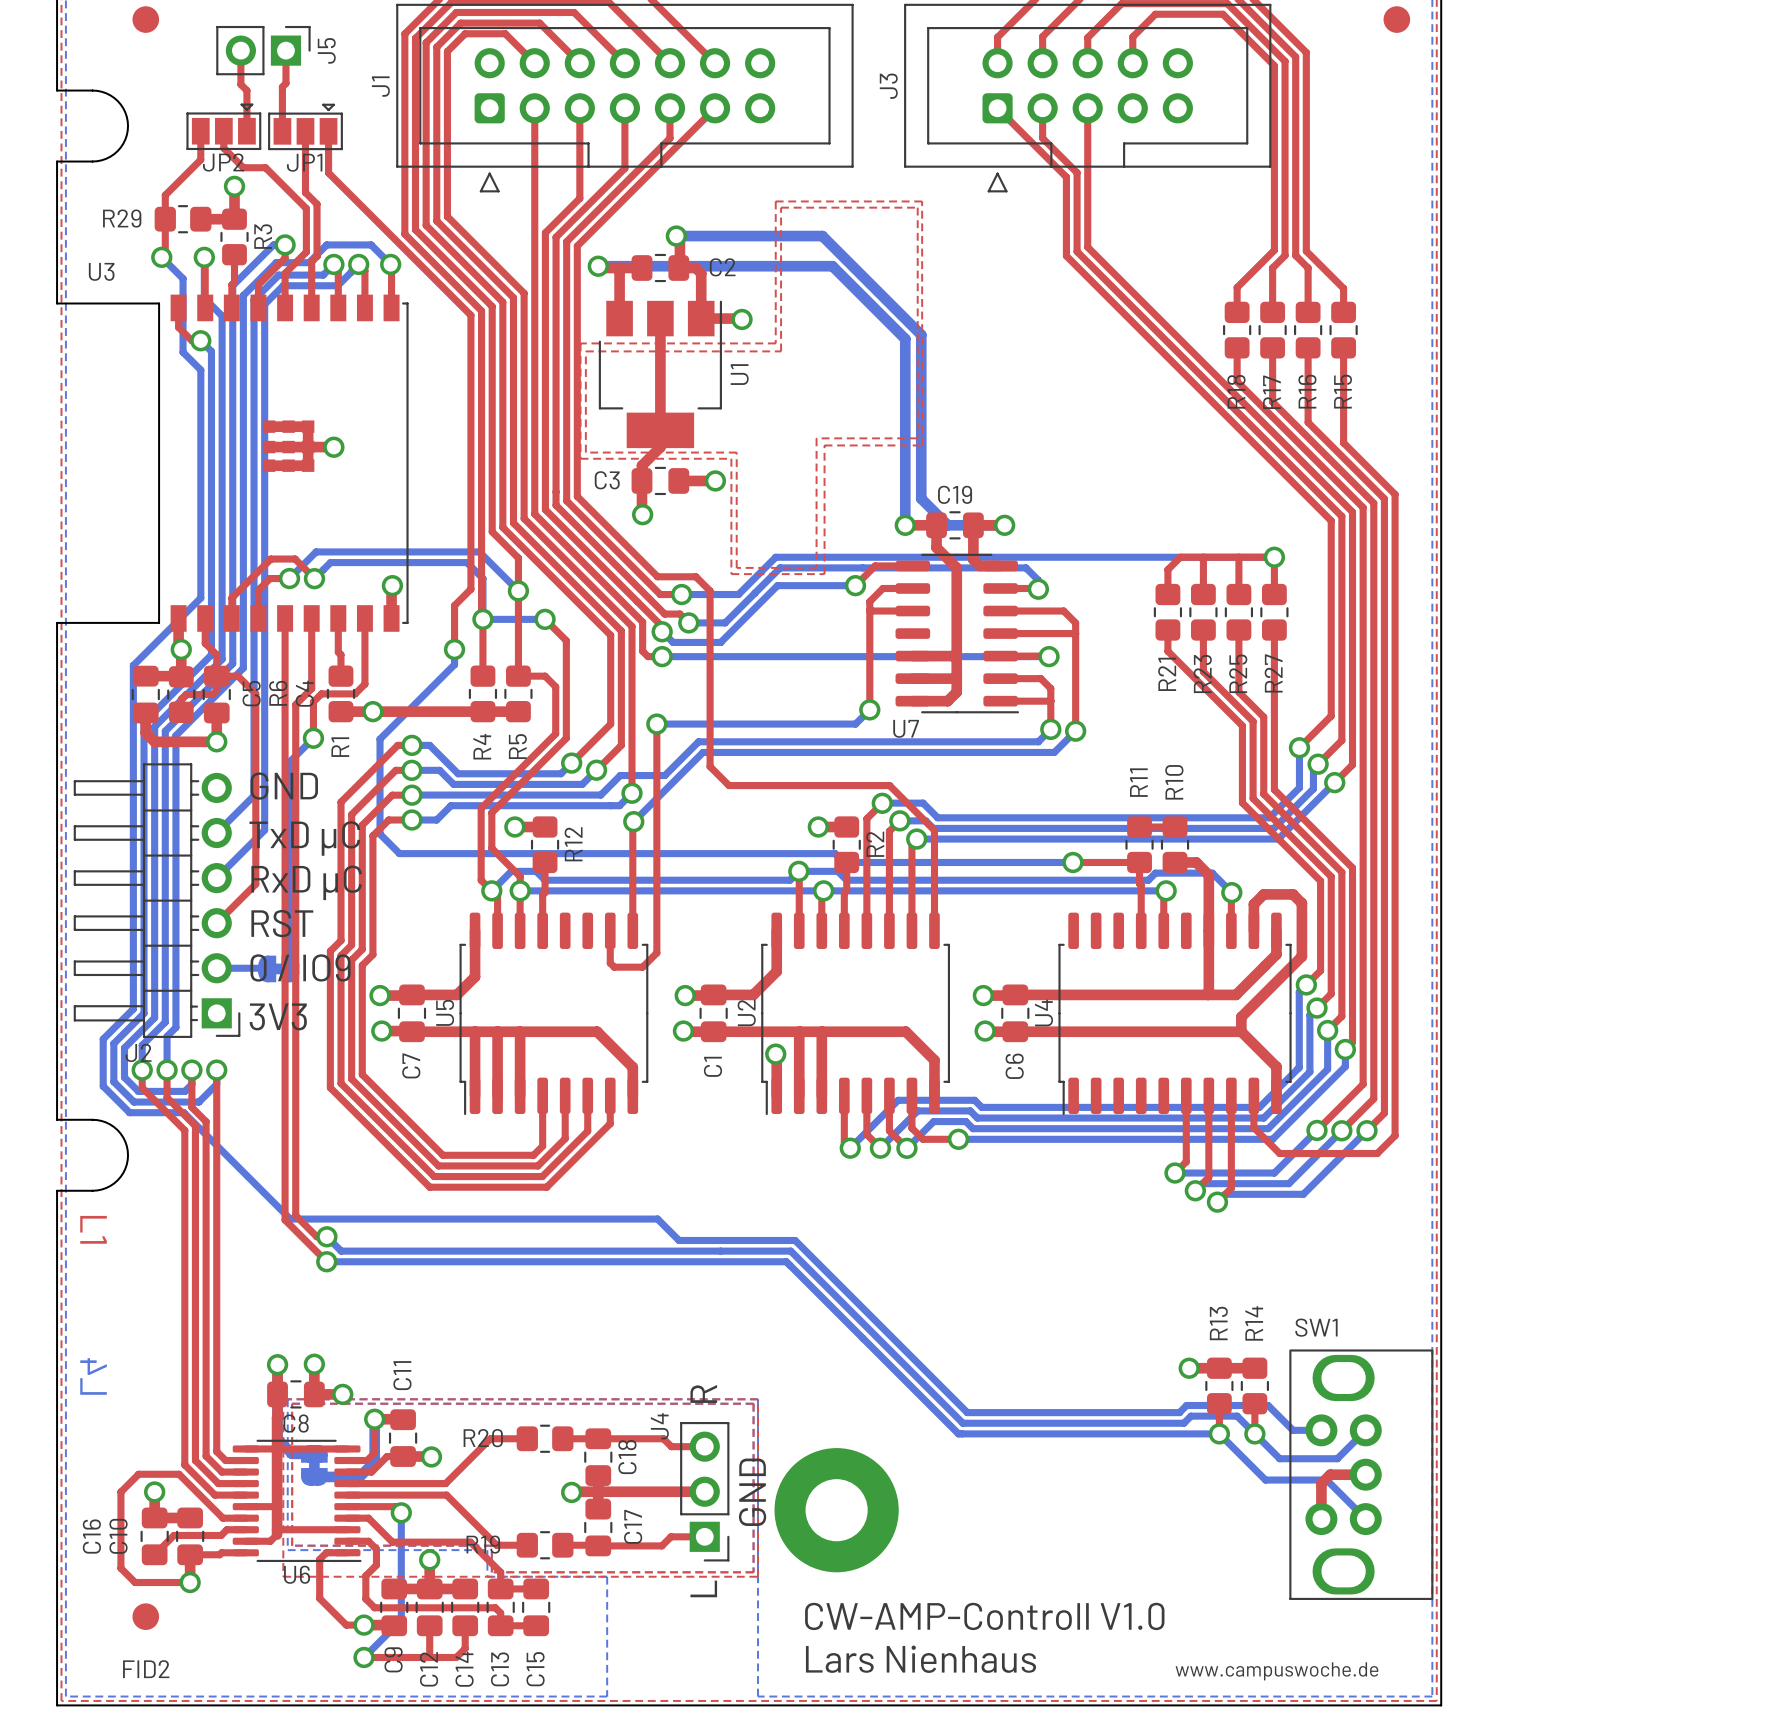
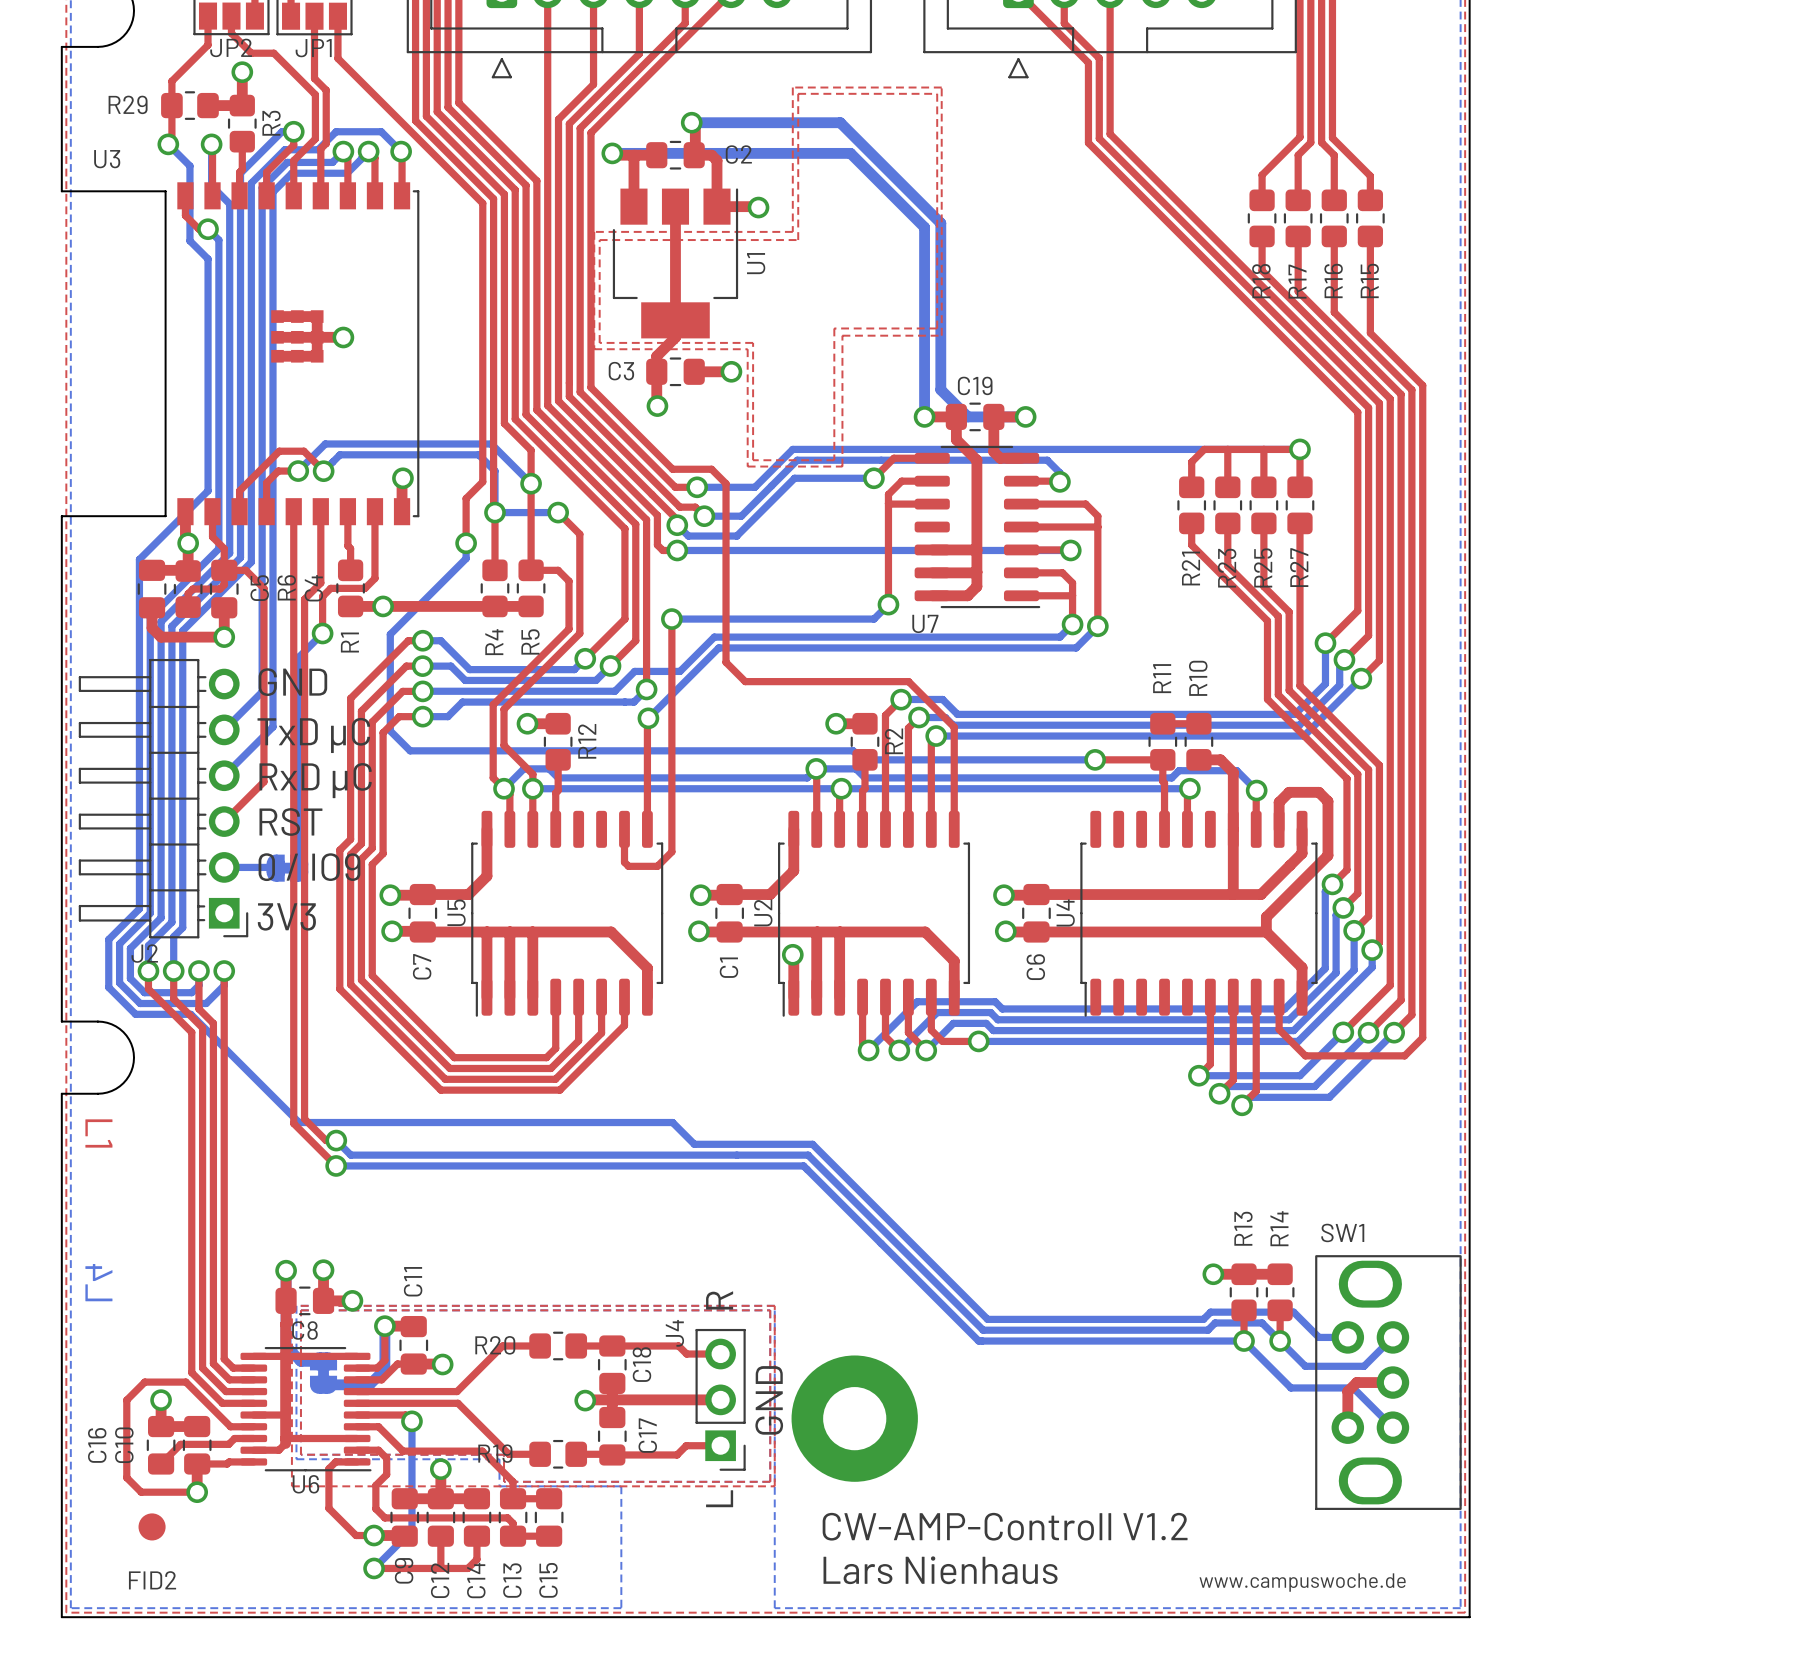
text: CW-AMP-Controll V1.0 (984, 1616) -> CW-AMP-Controll V1.2 (1005, 1526)

